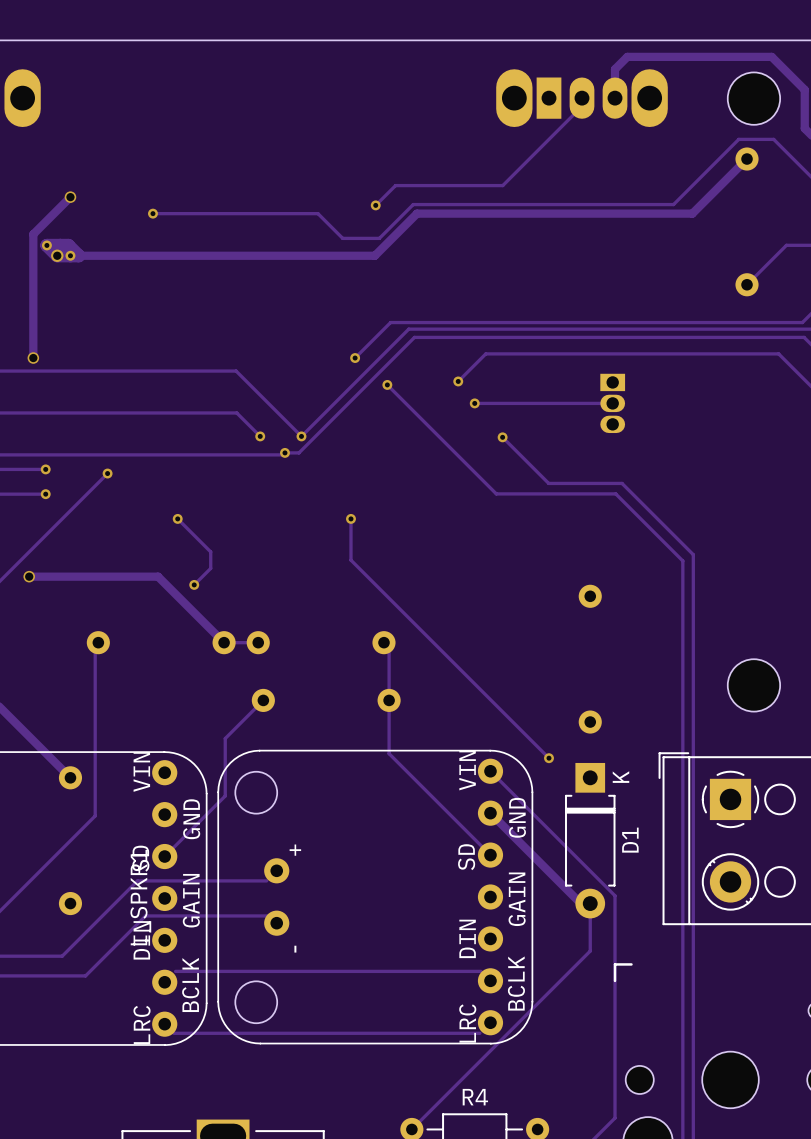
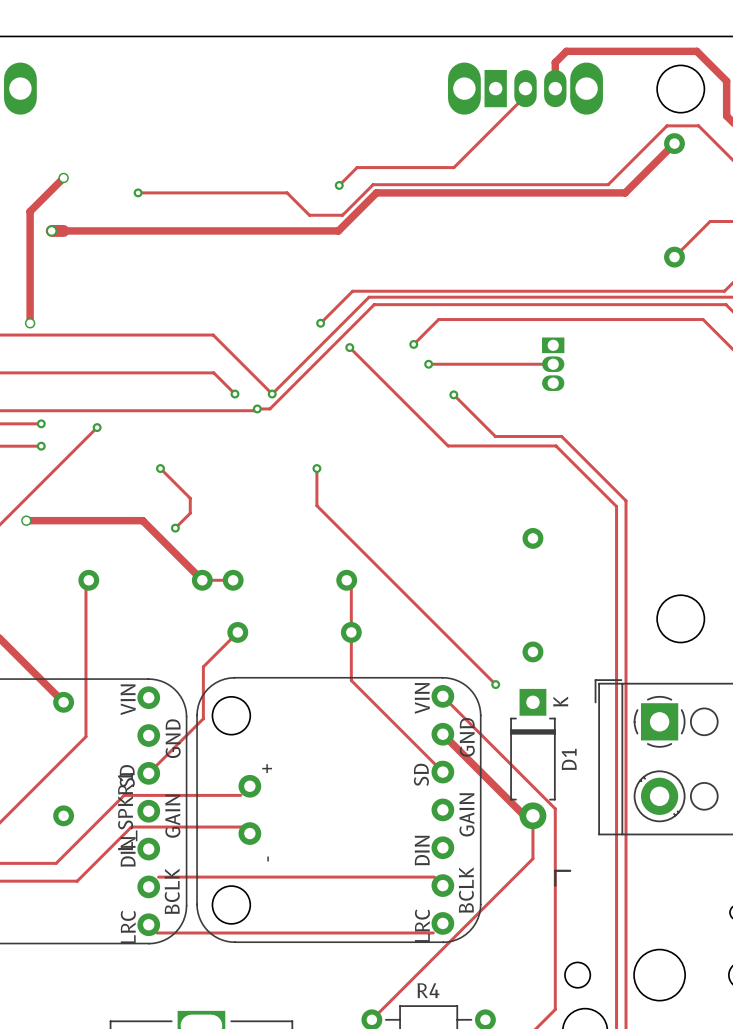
via: (46, 245) -> none
track: (60, 245) (70, 255) (78, 255) (68, 245) (46, 245) (57, 255) -> none
via: (70, 255) -> none

